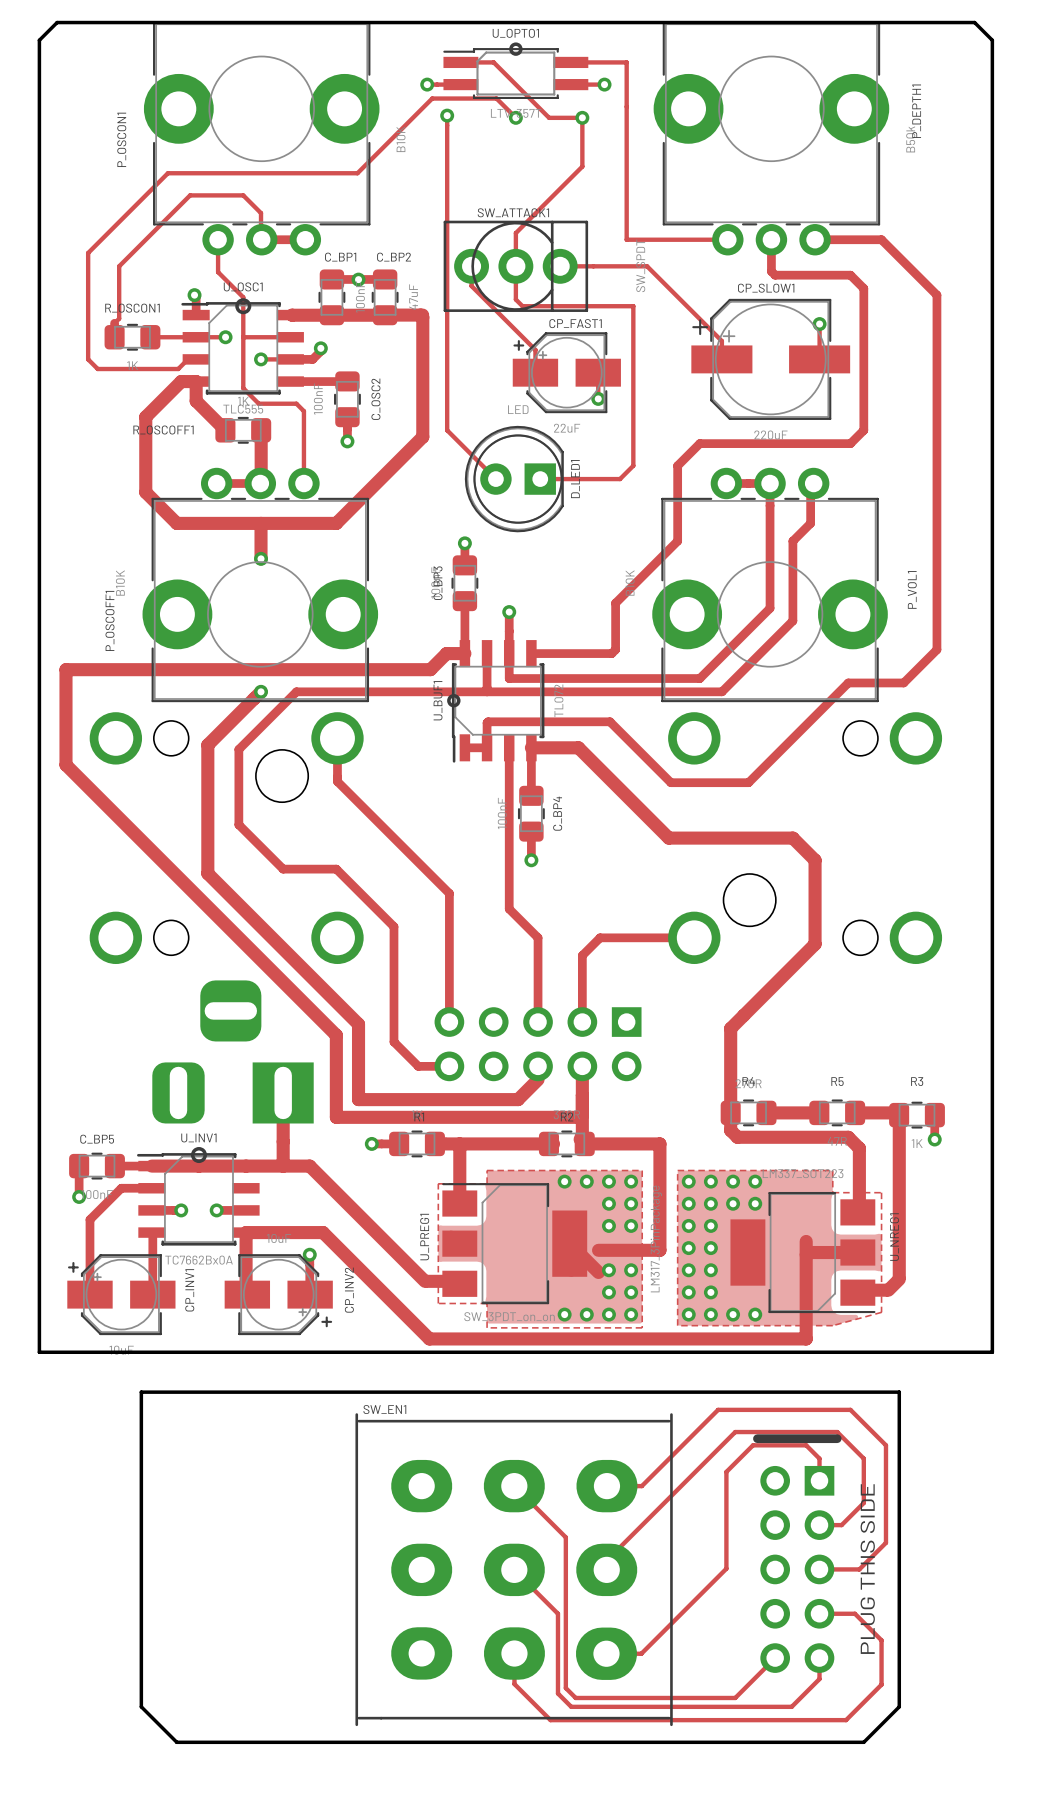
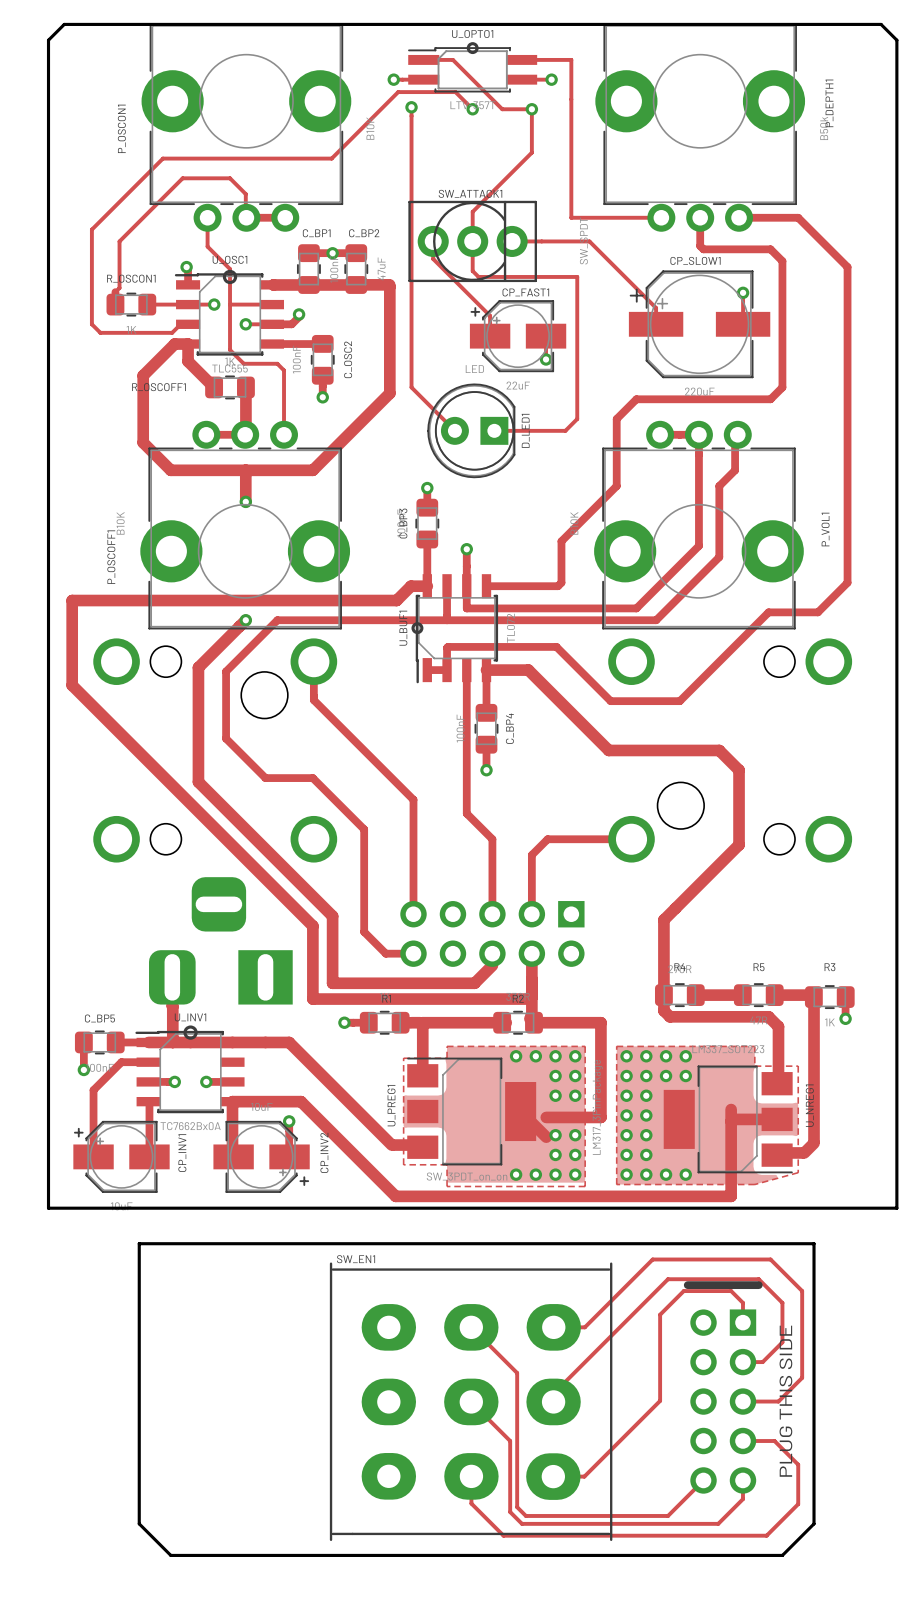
track: none -> (172, 977) (172, 1042)
track: (283, 1108) (283, 1166) -> none

